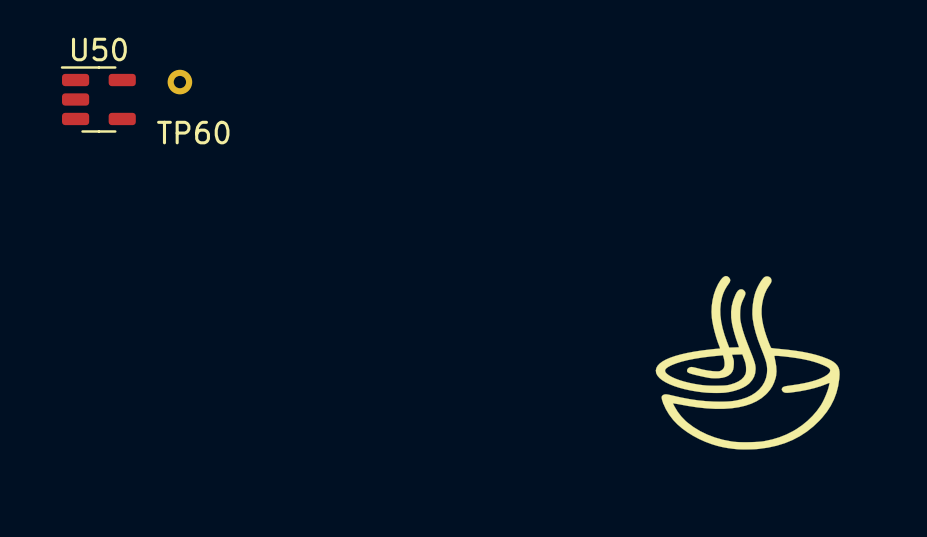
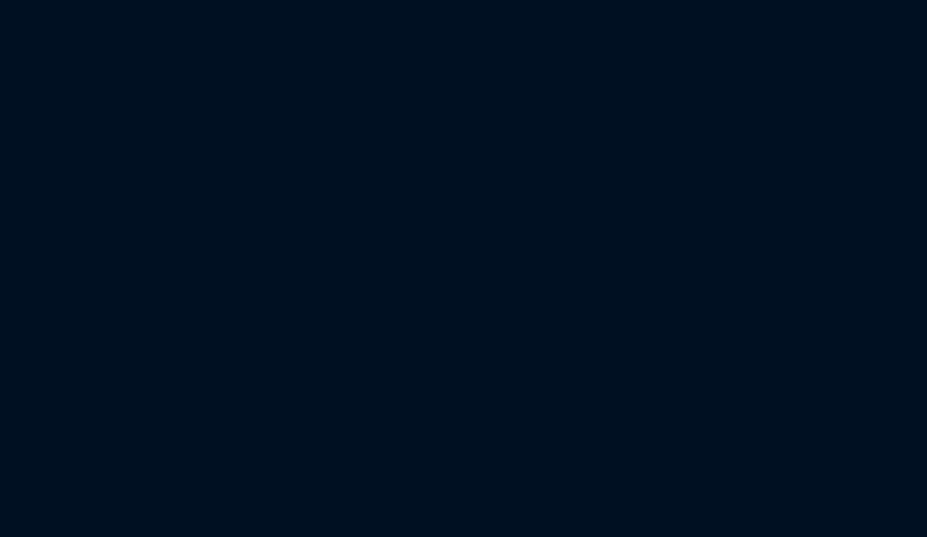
TP60: (179, 82) -> none
U50: (98, 99) -> none
drawing: [655, 275, 840, 450] -> none

